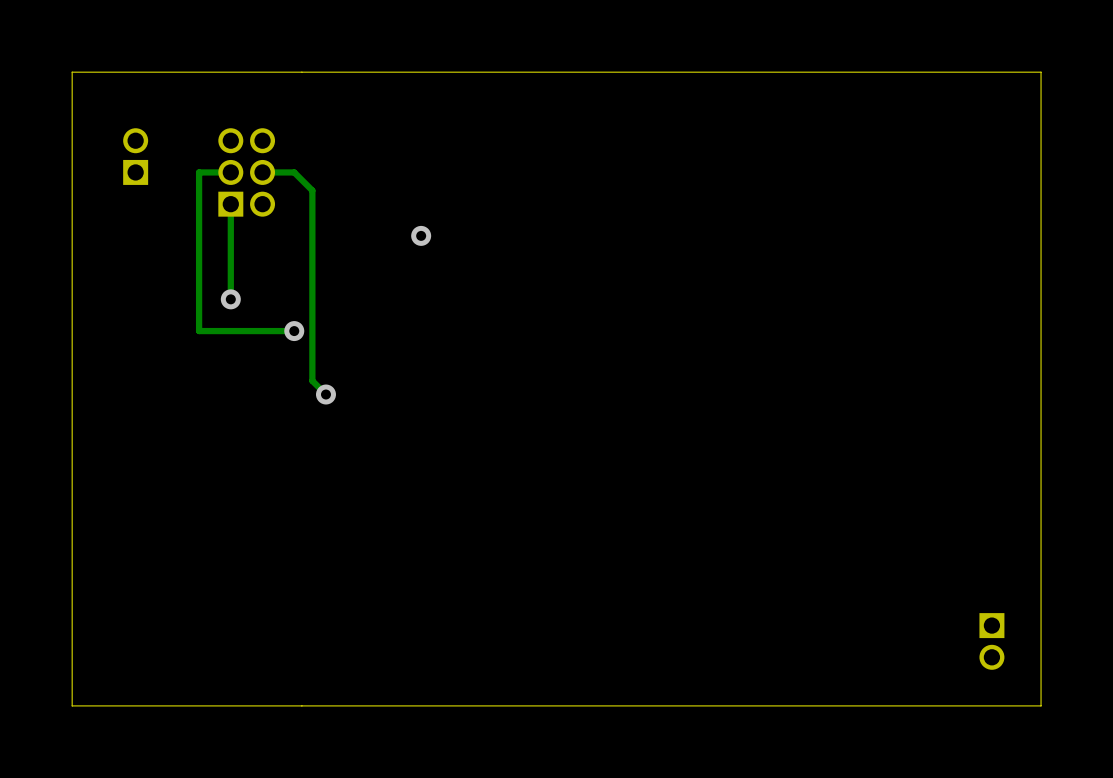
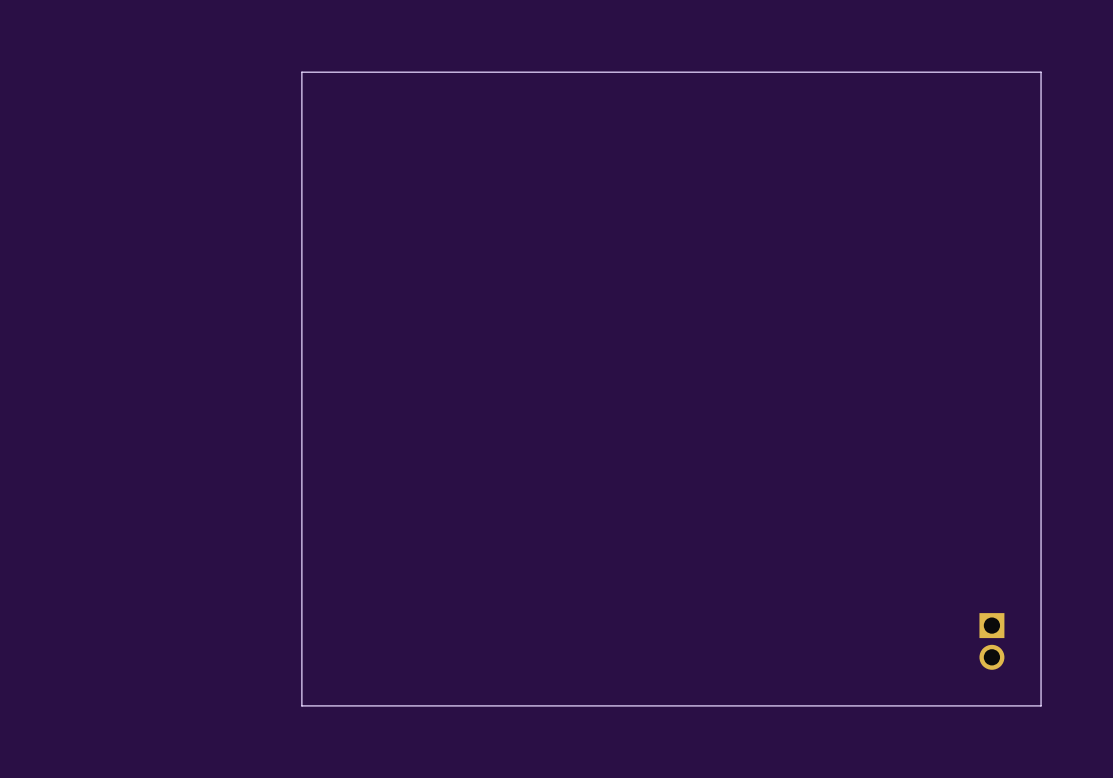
board edge: (301, 72) (72, 72) (72, 705) (301, 705) -> (301, 72) (301, 705)
part: (135, 156) -> none
track: (230, 172) (199, 172) (199, 331) (294, 331) -> none
part: (246, 172) -> none
track: (262, 172) (294, 172) (312, 190) (312, 380) (325, 394) -> none
track: (230, 204) (230, 299) -> none
via: (421, 235) -> none
via: (230, 299) -> none
via: (294, 331) -> none
via: (325, 394) -> none

